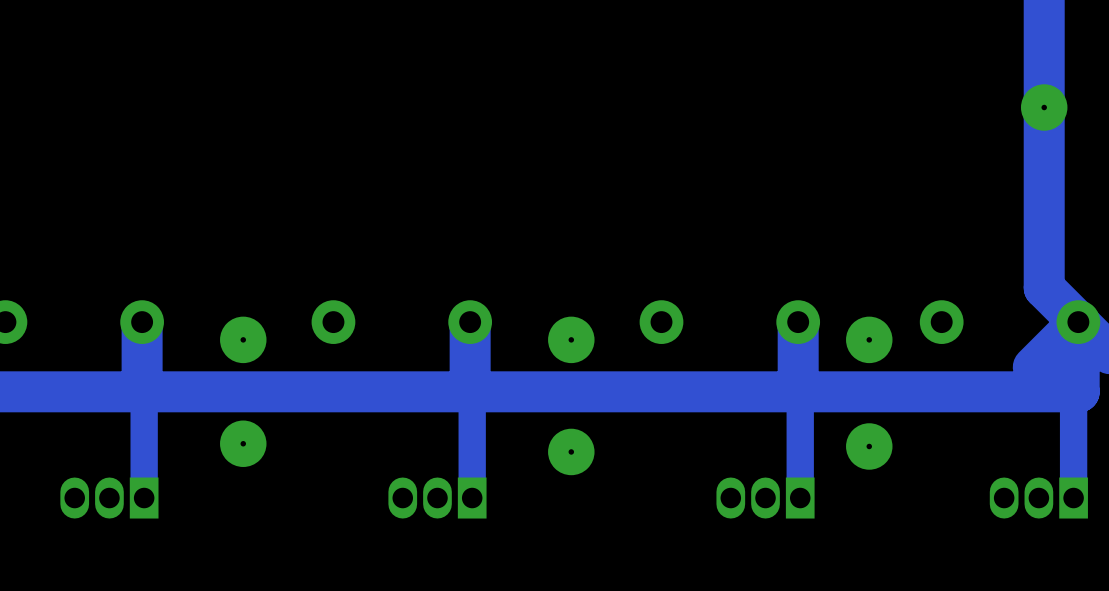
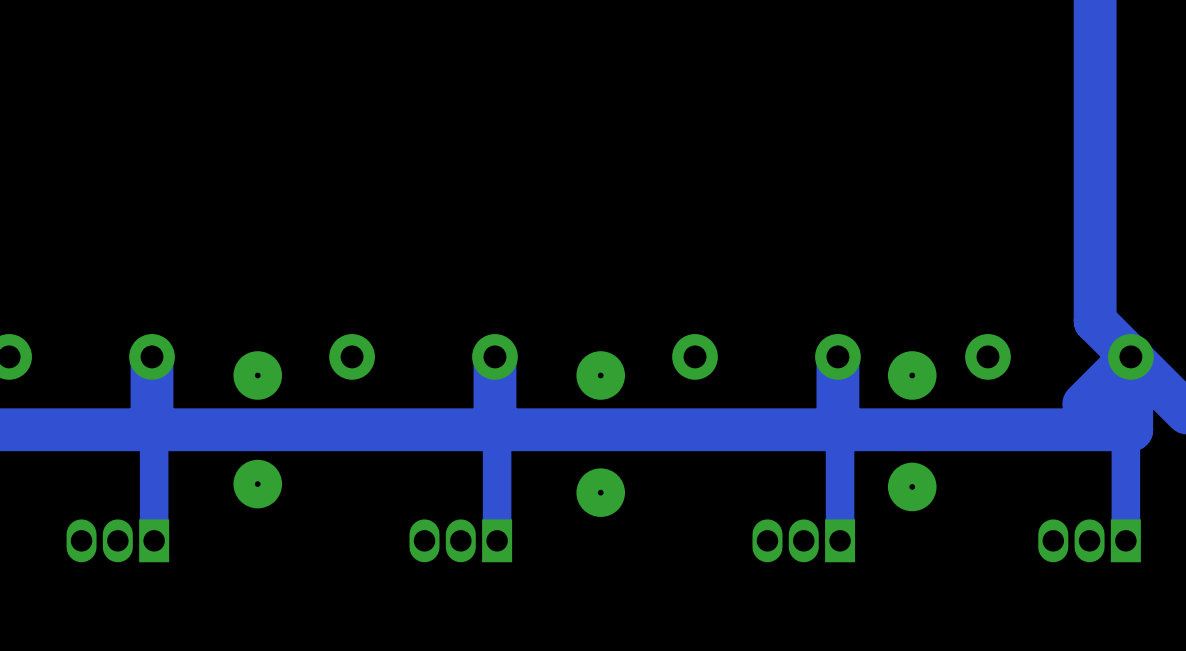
via: (1044, 107) -> none

